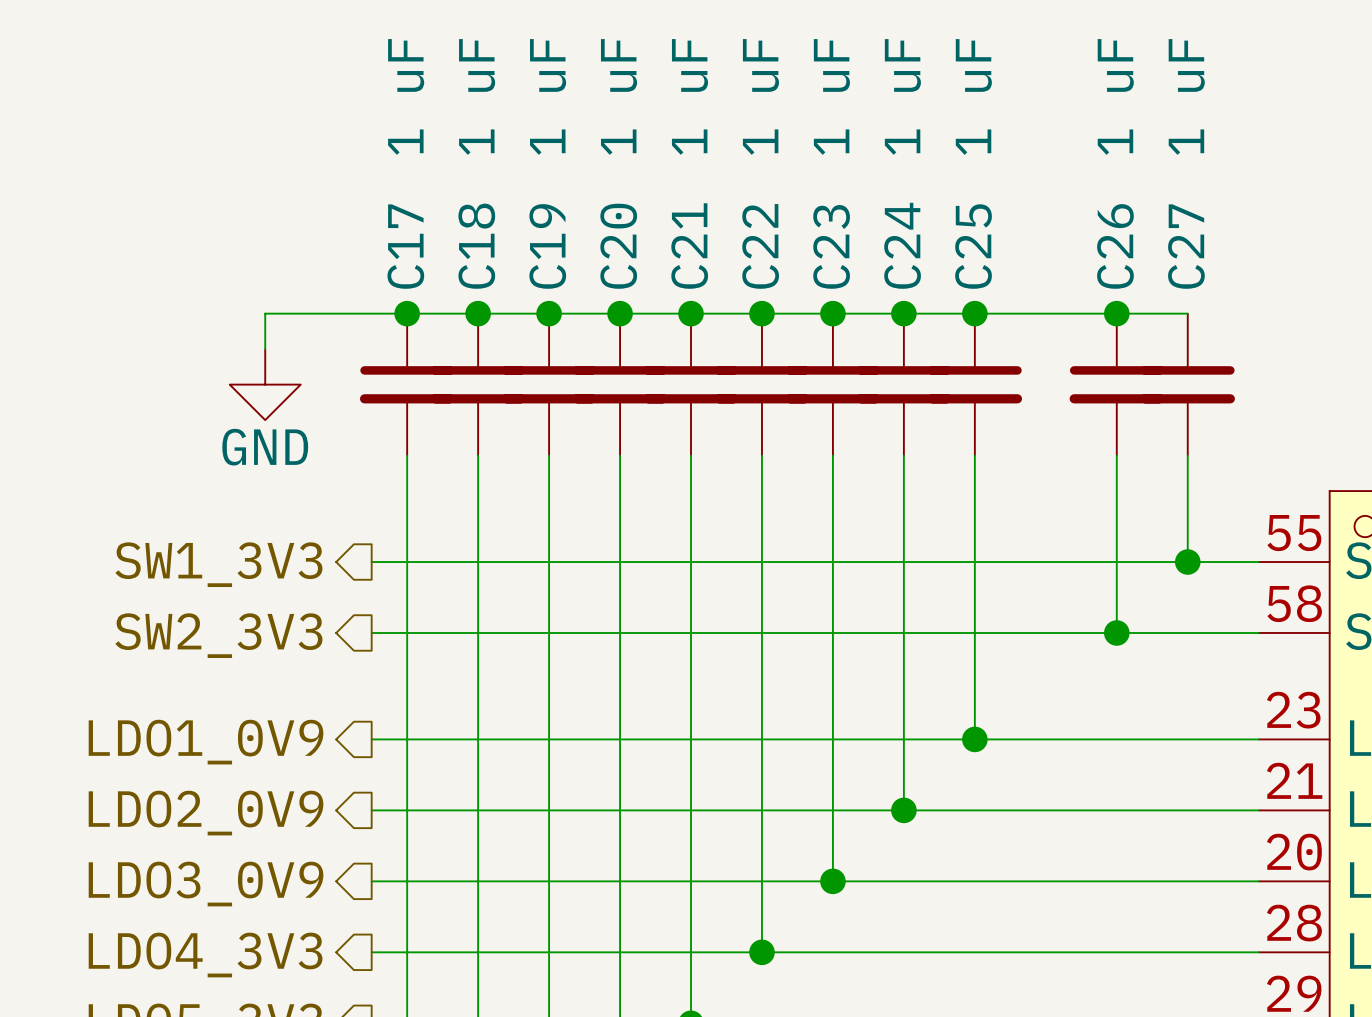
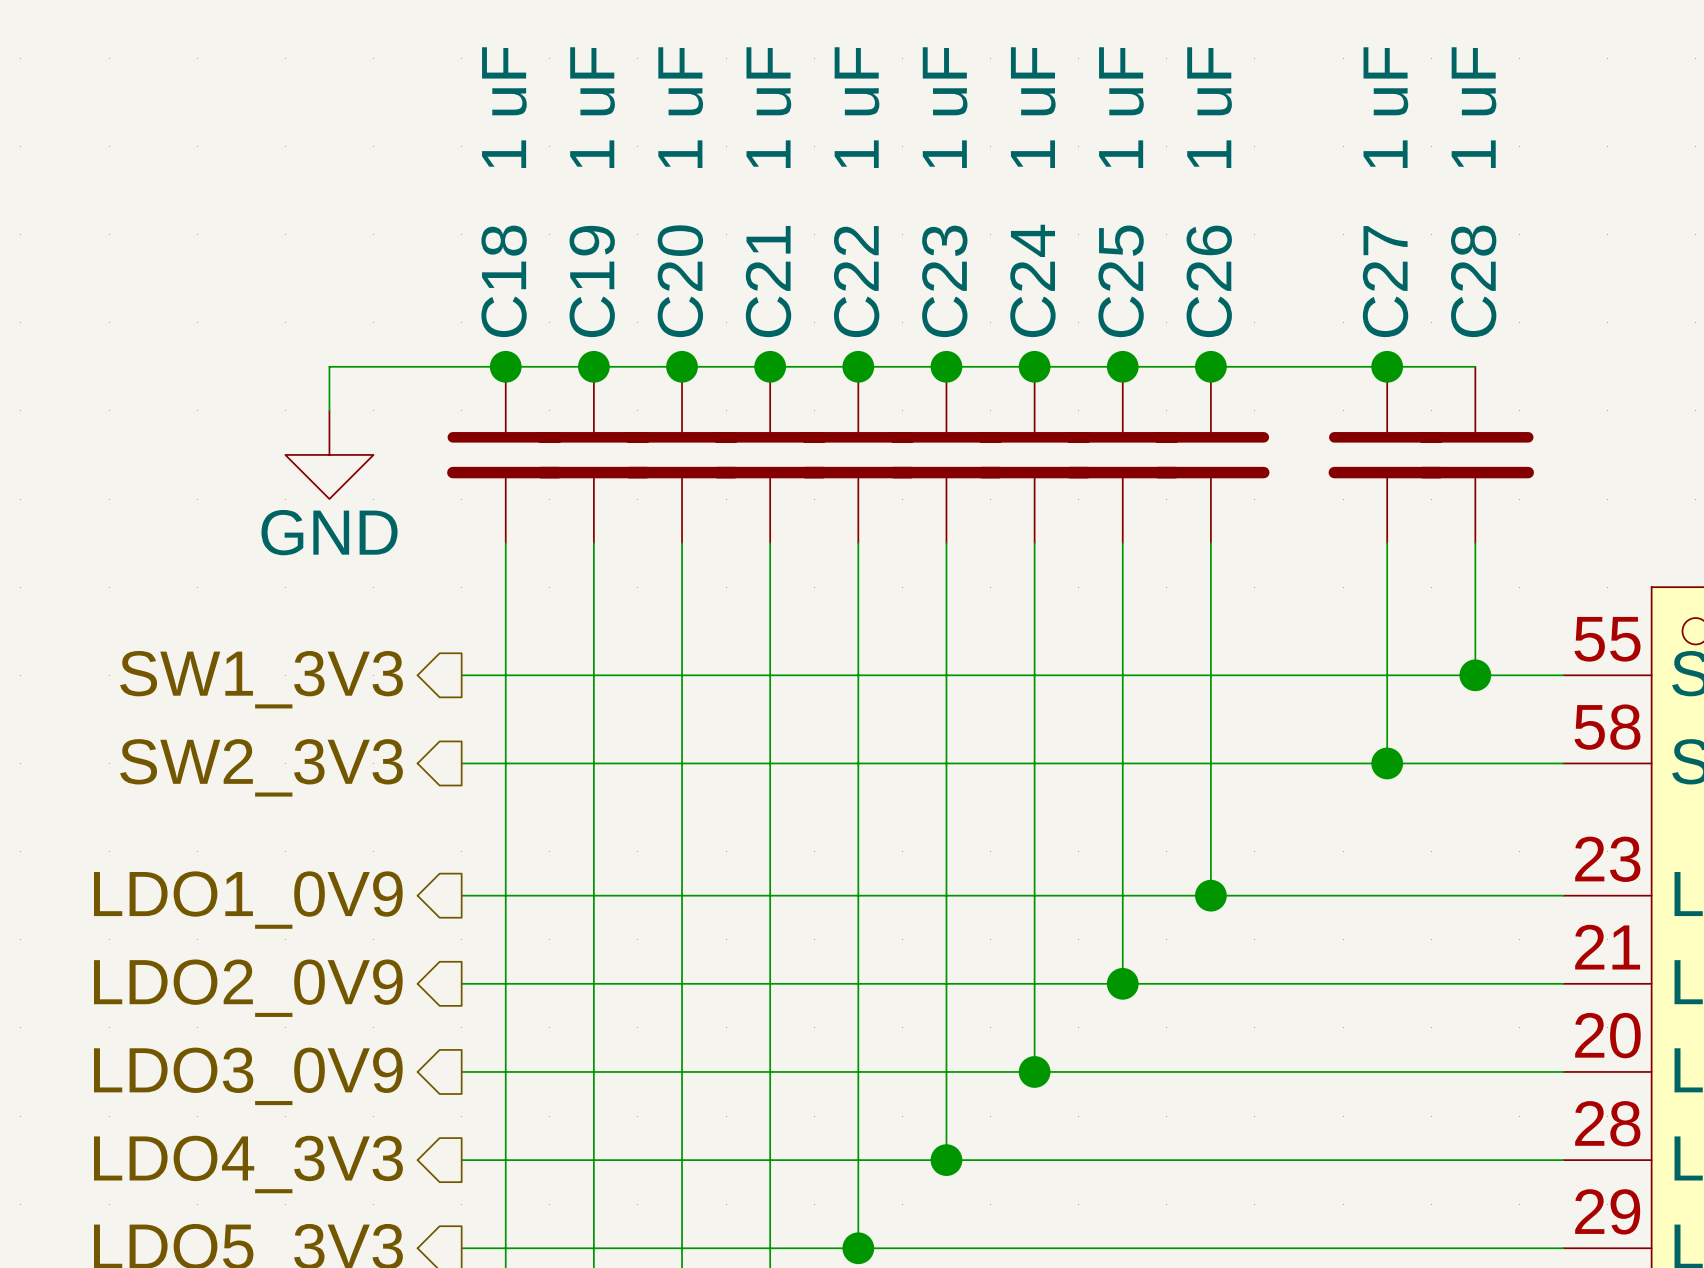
C24 name: C24 (902, 245) -> C25 (1121, 281)
C17 name: C17 (405, 246) -> C18 (504, 281)
C18 name: C18 (476, 246) -> C19 (592, 281)
C19 name: C19 (547, 246) -> C20 (680, 281)
C20 name: C20 (618, 246) -> C21 (768, 281)
C21 name: C21 (689, 246) -> C22 (856, 281)
C22 name: C22 (760, 246) -> C23 (944, 281)
C23 name: C23 (831, 246) -> C24 (1032, 280)
C25 name: C25 (973, 246) -> C26 (1209, 281)
C26 name: C26 (1115, 246) -> C27 (1385, 281)
C27 name: C27 (1186, 246) -> C28 (1473, 281)

